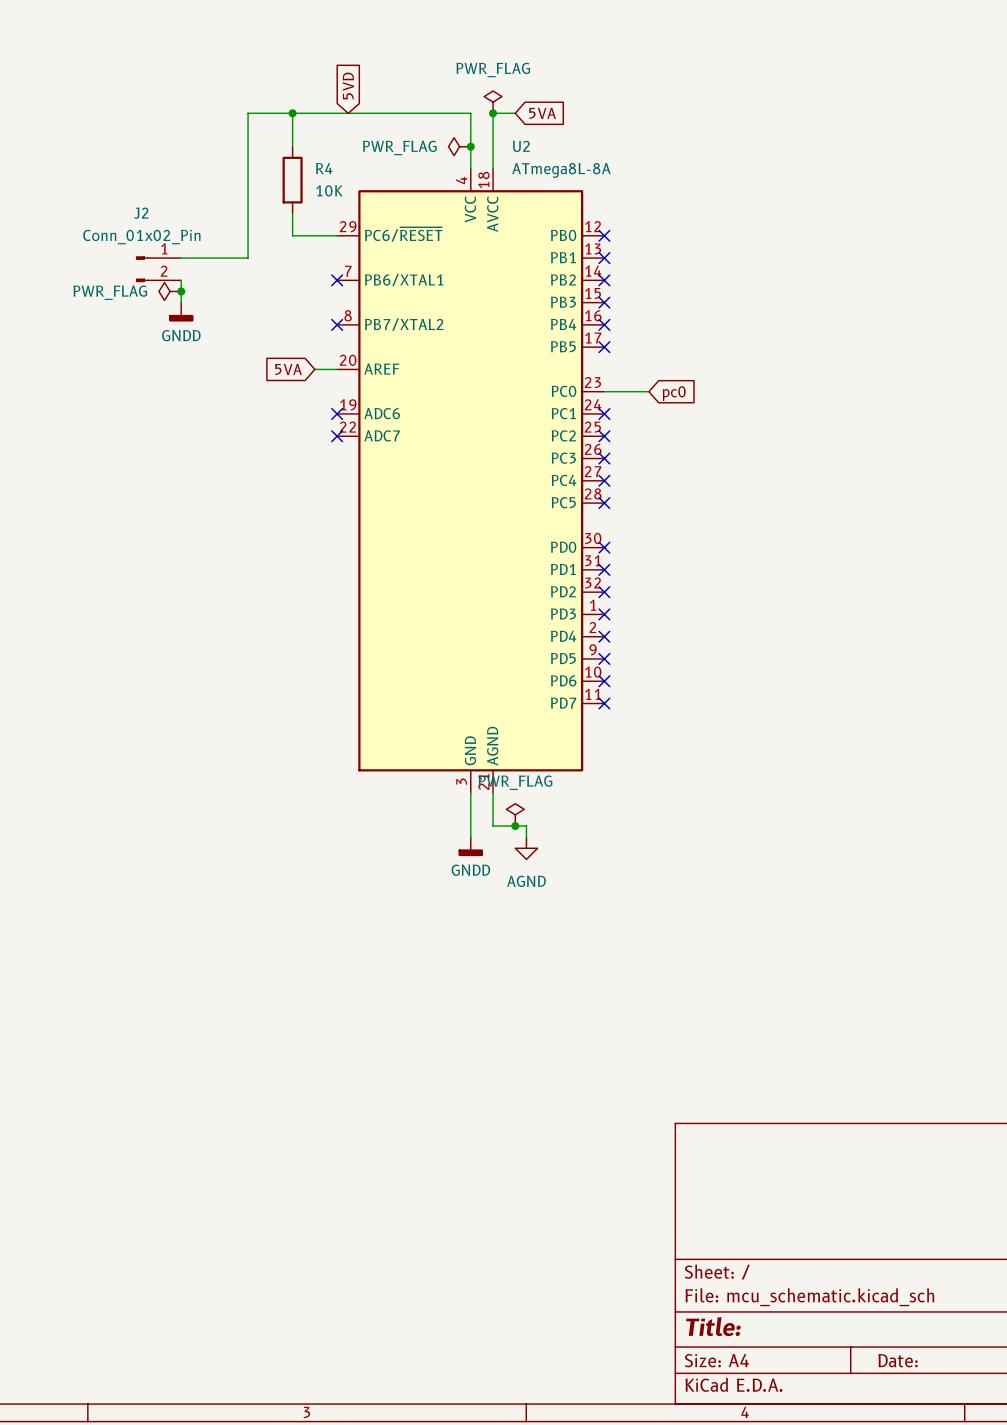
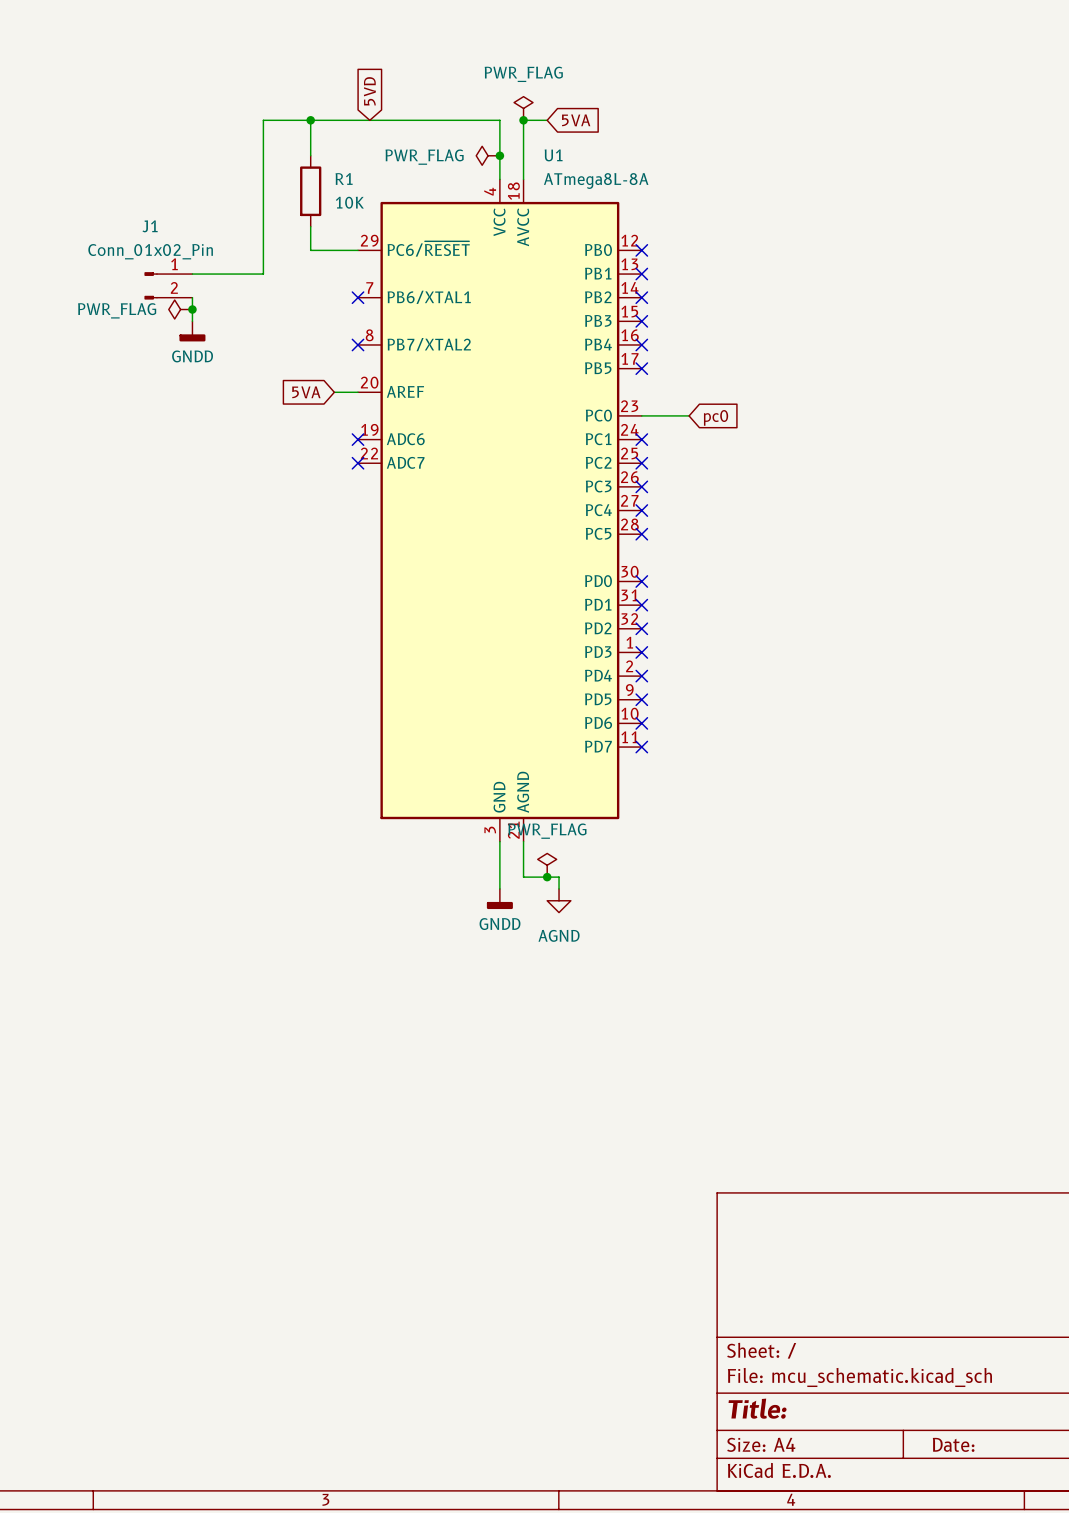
U2 name: U2 (521, 146) -> U1 (553, 155)
R4 name: R4 (324, 168) -> R1 (344, 178)
J2 name: J2 (141, 213) -> J1 (150, 226)

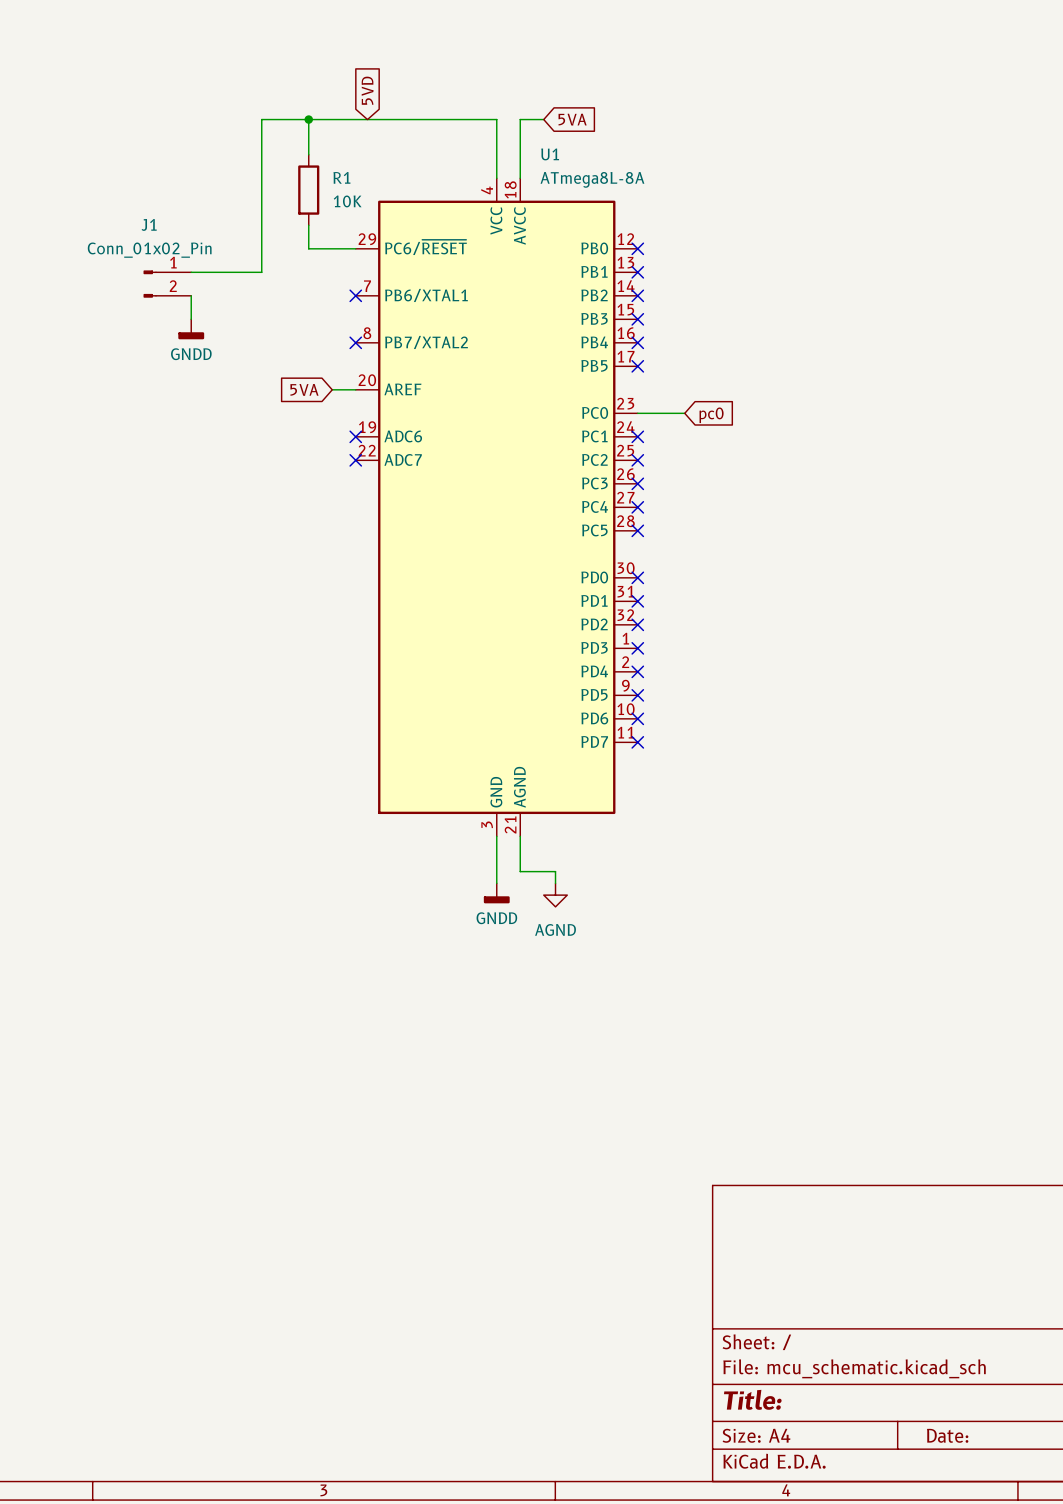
power symbol: PWR_FLAG (523, 108) -> none
junction: (523, 120) -> none
power symbol: PWR_FLAG (488, 155) -> none
junction: (499, 155) -> none
power symbol: PWR_FLAG (180, 309) -> none
junction: (192, 309) -> none
power symbol: PWR_FLAG (547, 865) -> none
junction: (547, 877) -> none

